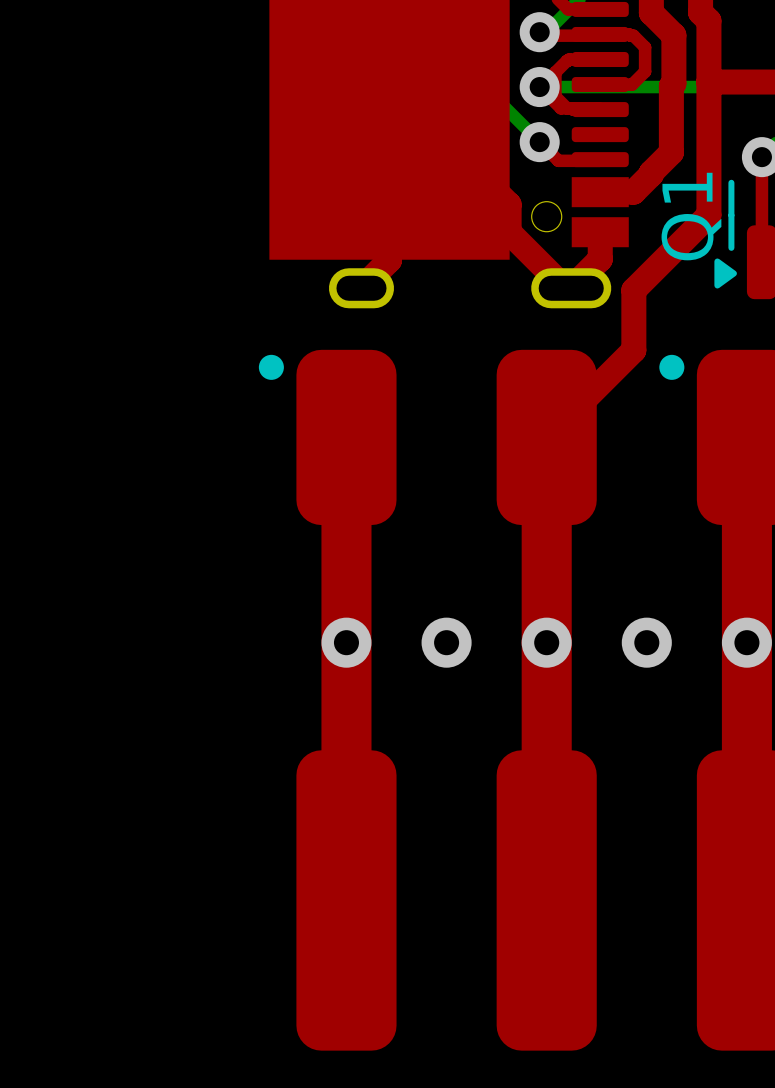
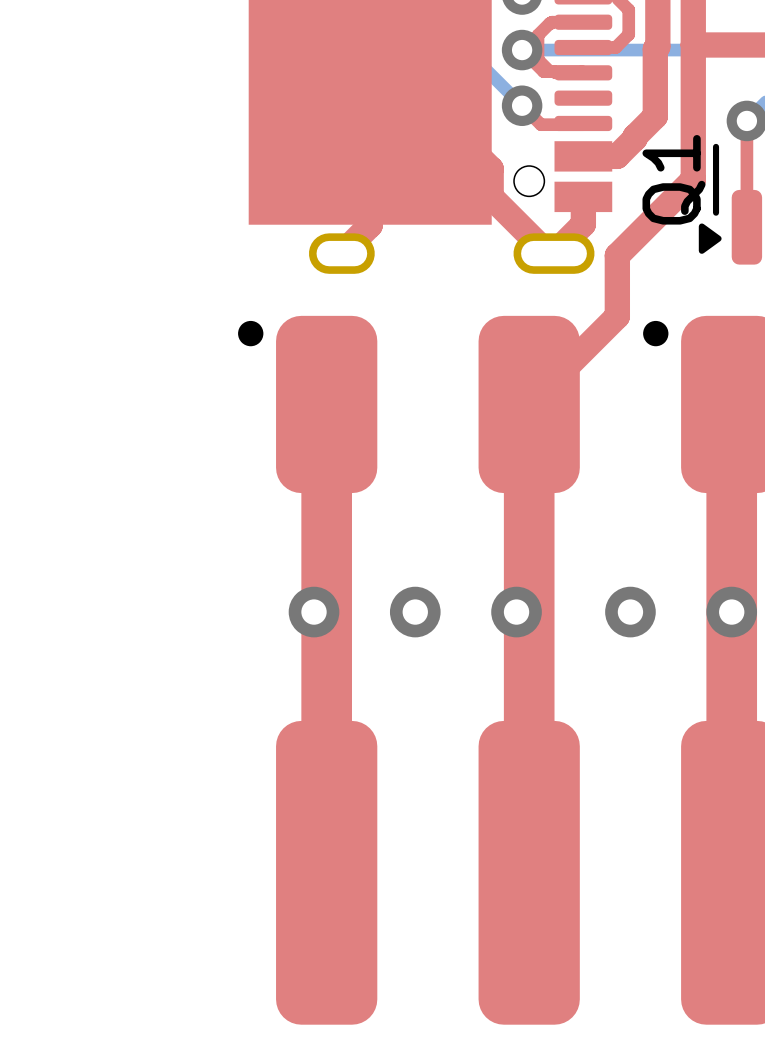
via position: (346, 642) -> (314, 612)
via position: (446, 642) -> (415, 612)
via position: (546, 642) -> (516, 612)

